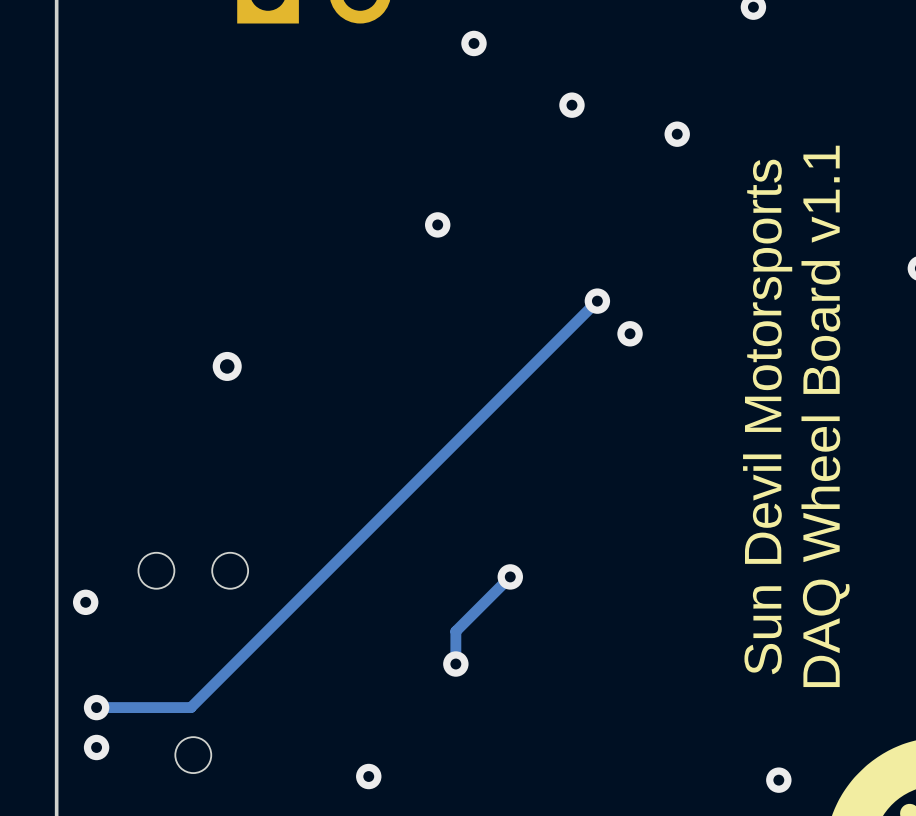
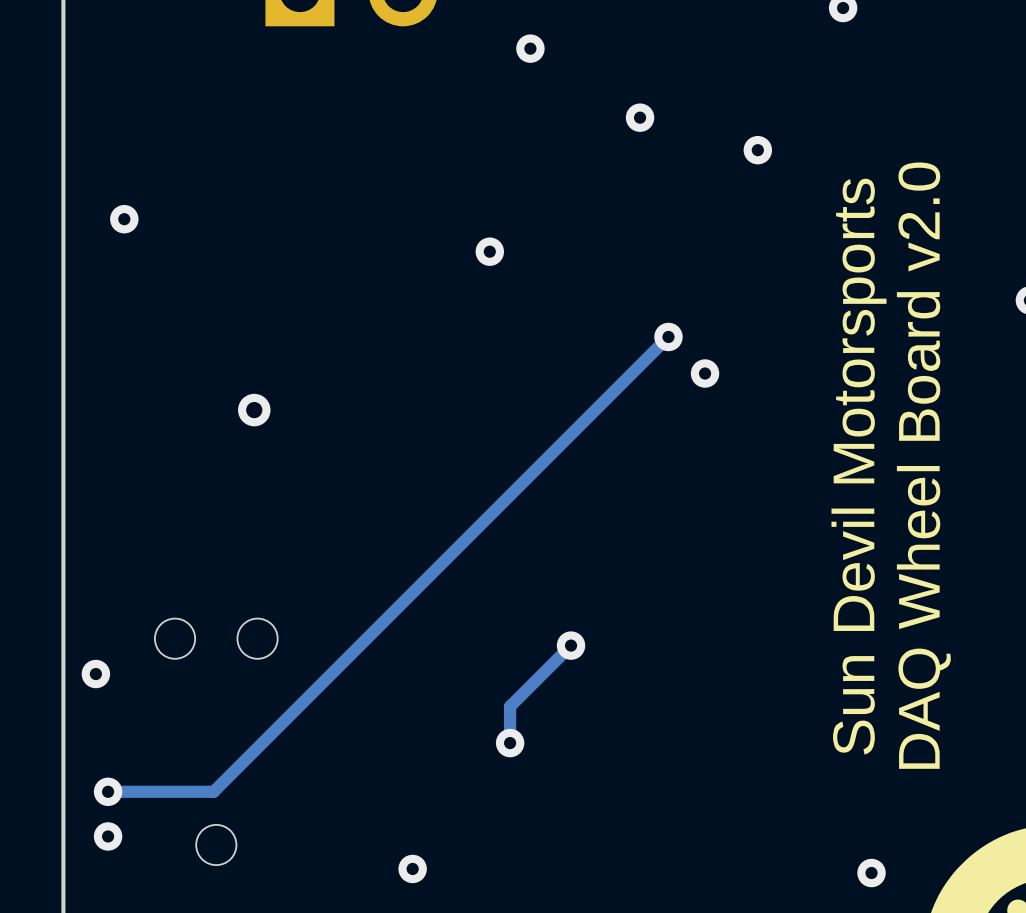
via: none -> (124, 219)
text: DAQ Wheel Board v1.1 (825, 416) -> DAQ Wheel Board v2.0 (923, 465)

